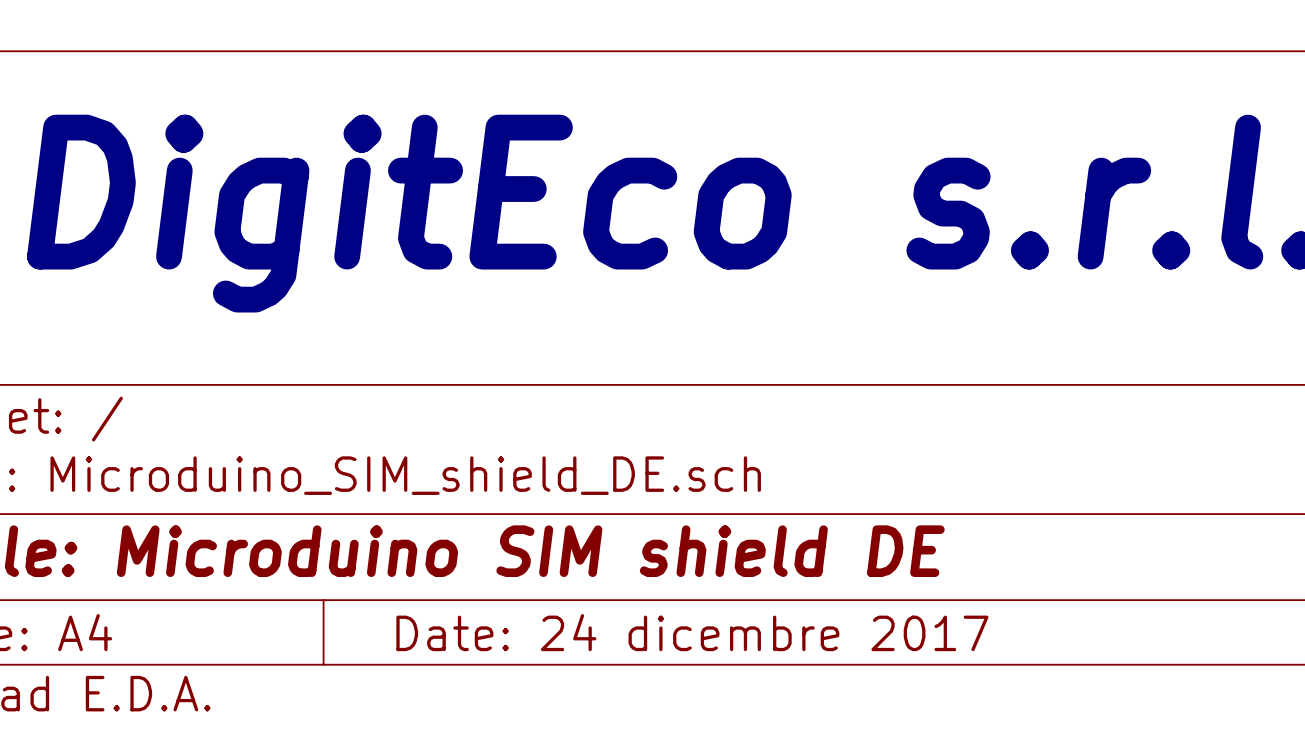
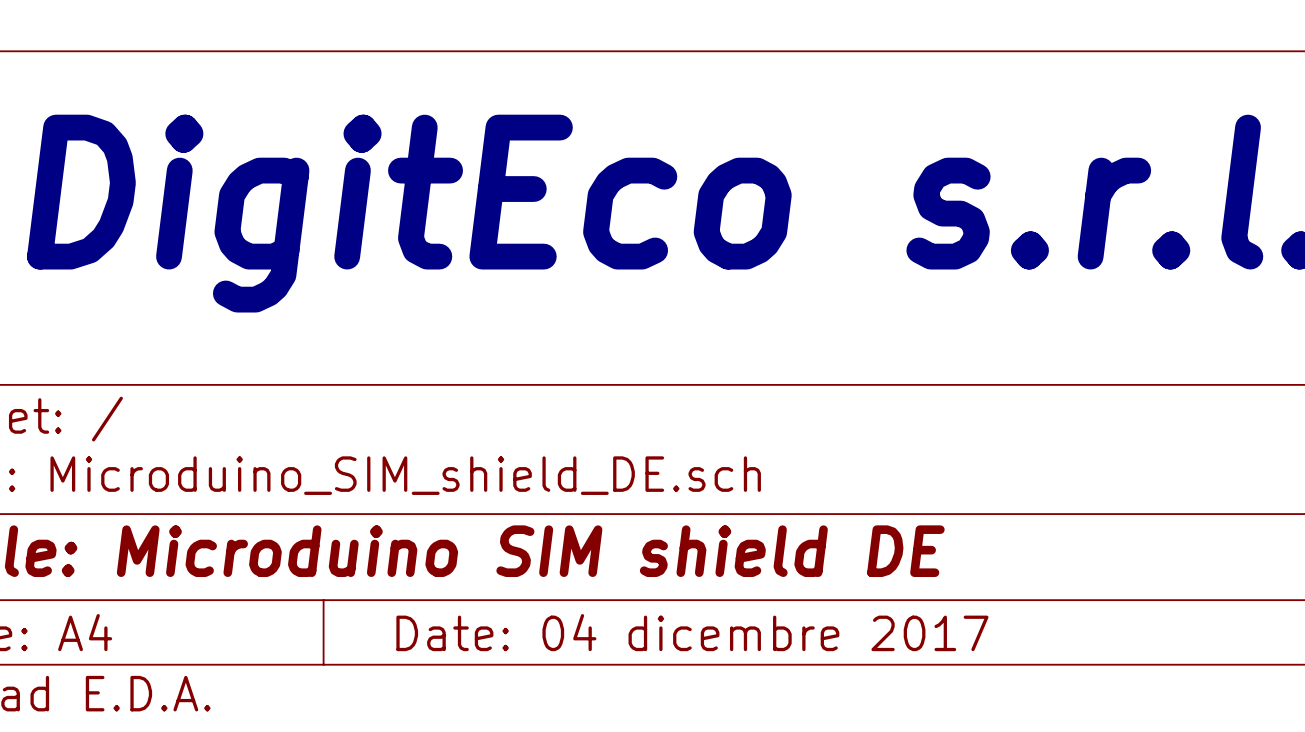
title block: Date: 24 dicembre 2017 (692, 632) -> Date: 04 dicembre 2017 (692, 632)

